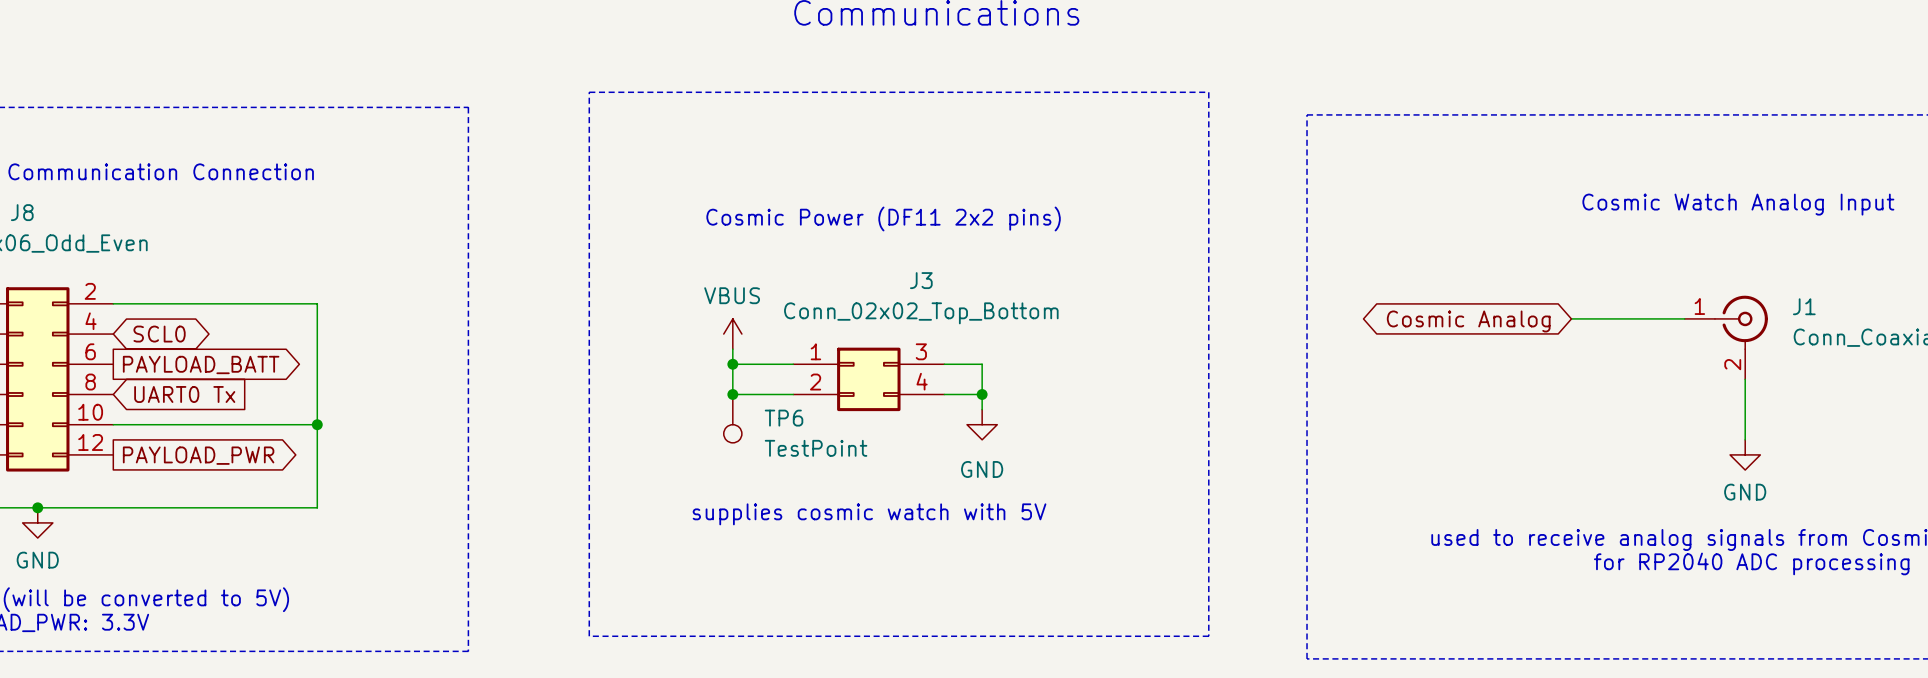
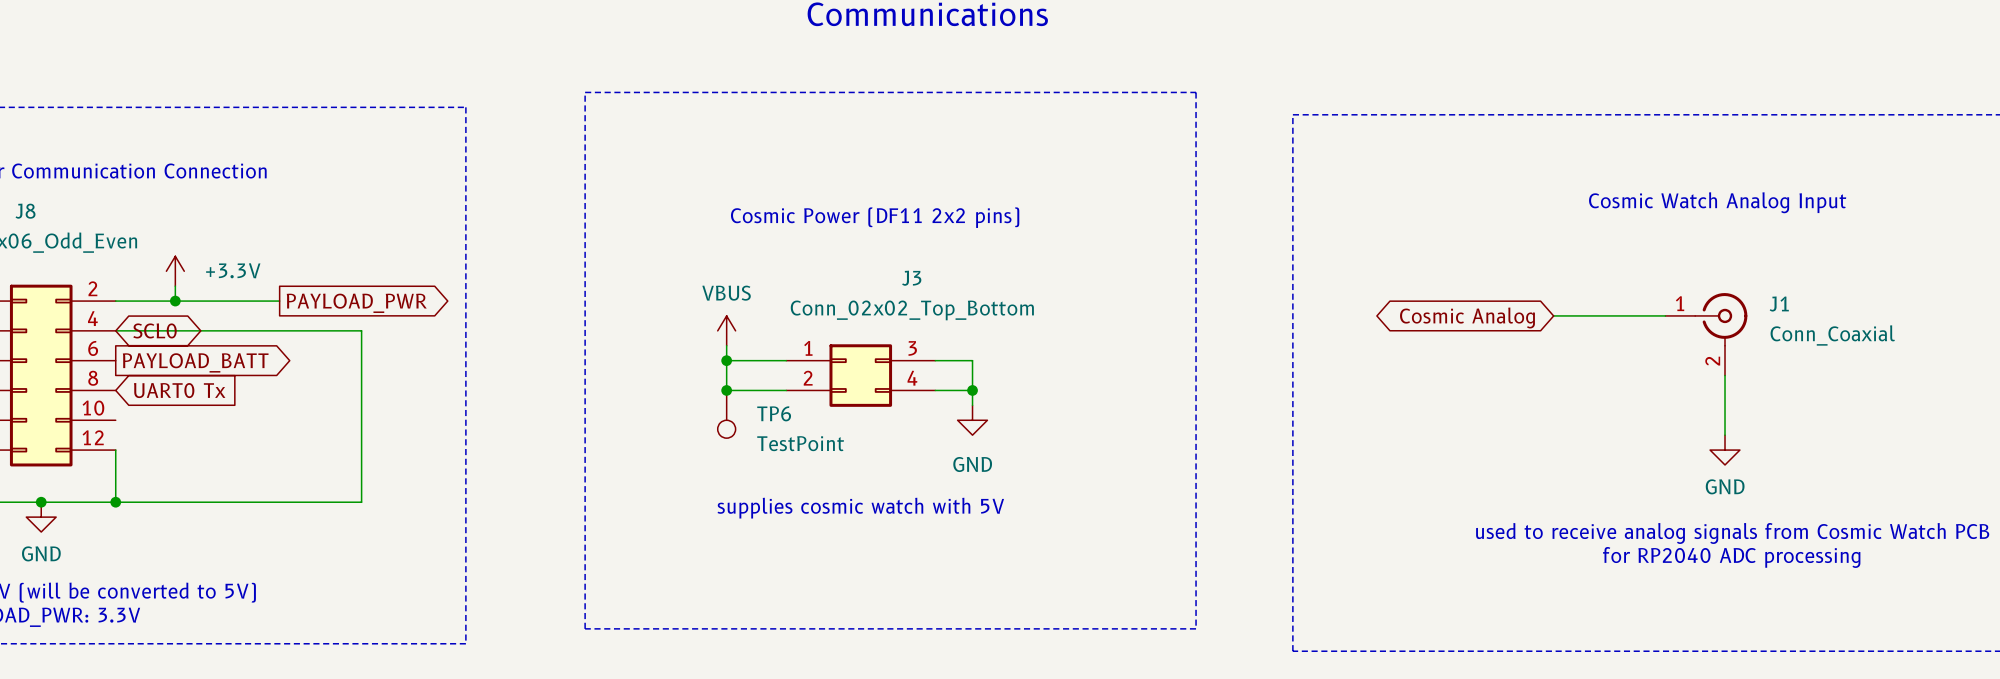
power symbol: none -> +3.3V (175, 271)
wire: none -> (175, 286) (175, 301)
junction: none -> (175, 301)
wire: (279, 303) (317, 303) (317, 507) -> (115, 330) (361, 330) (361, 502) (316, 502)
wire: (113, 424) (317, 424) -> none
junction: (317, 424) -> none
wire: none -> (115, 450) (115, 502)
global label position: PAYLOAD_PWR (198, 455) -> PAYLOAD_PWR (356, 303)
junction: none -> (115, 502)

